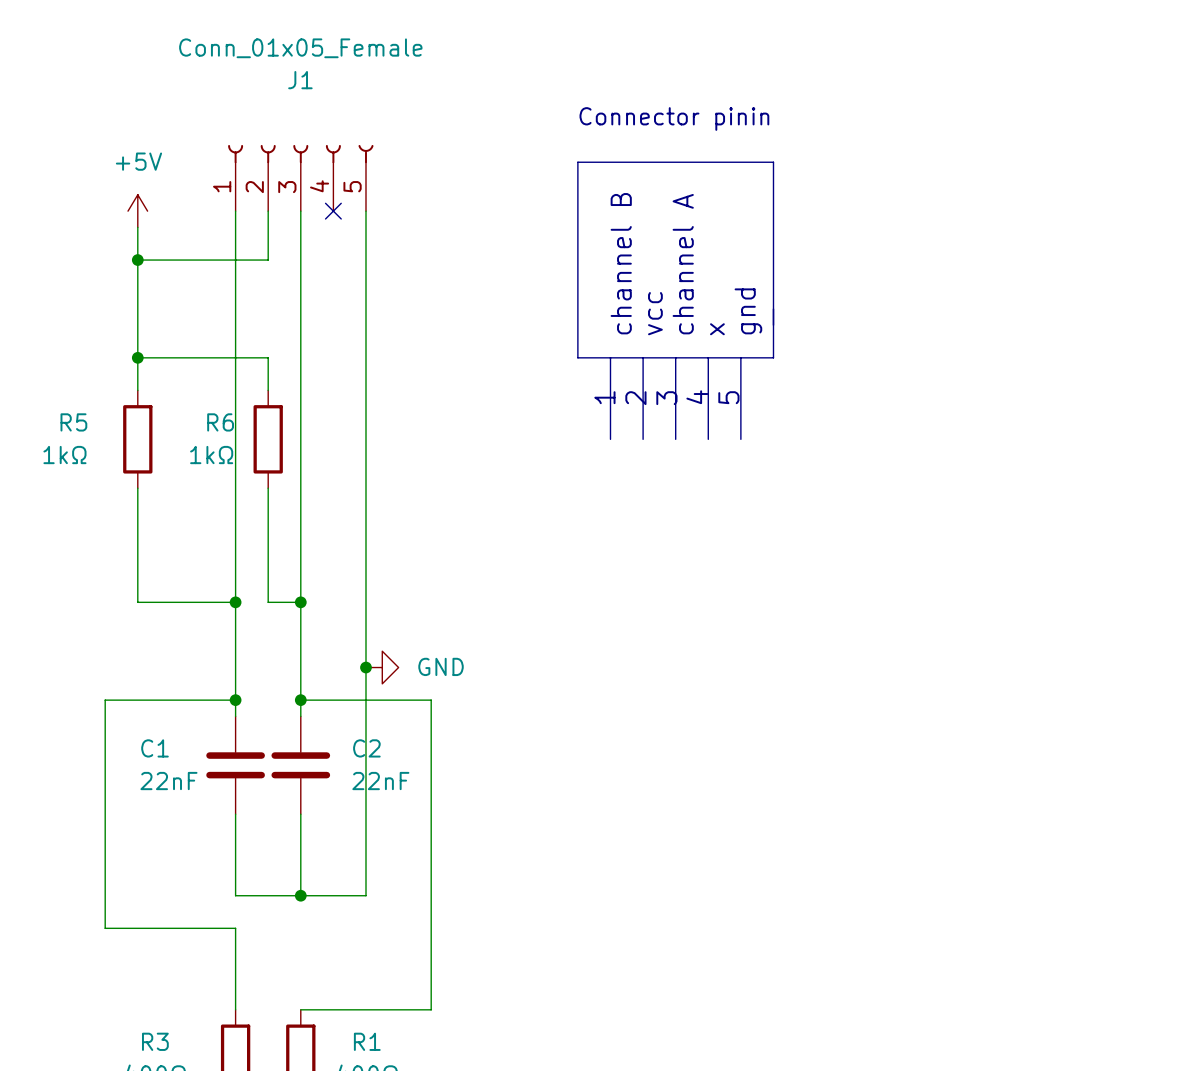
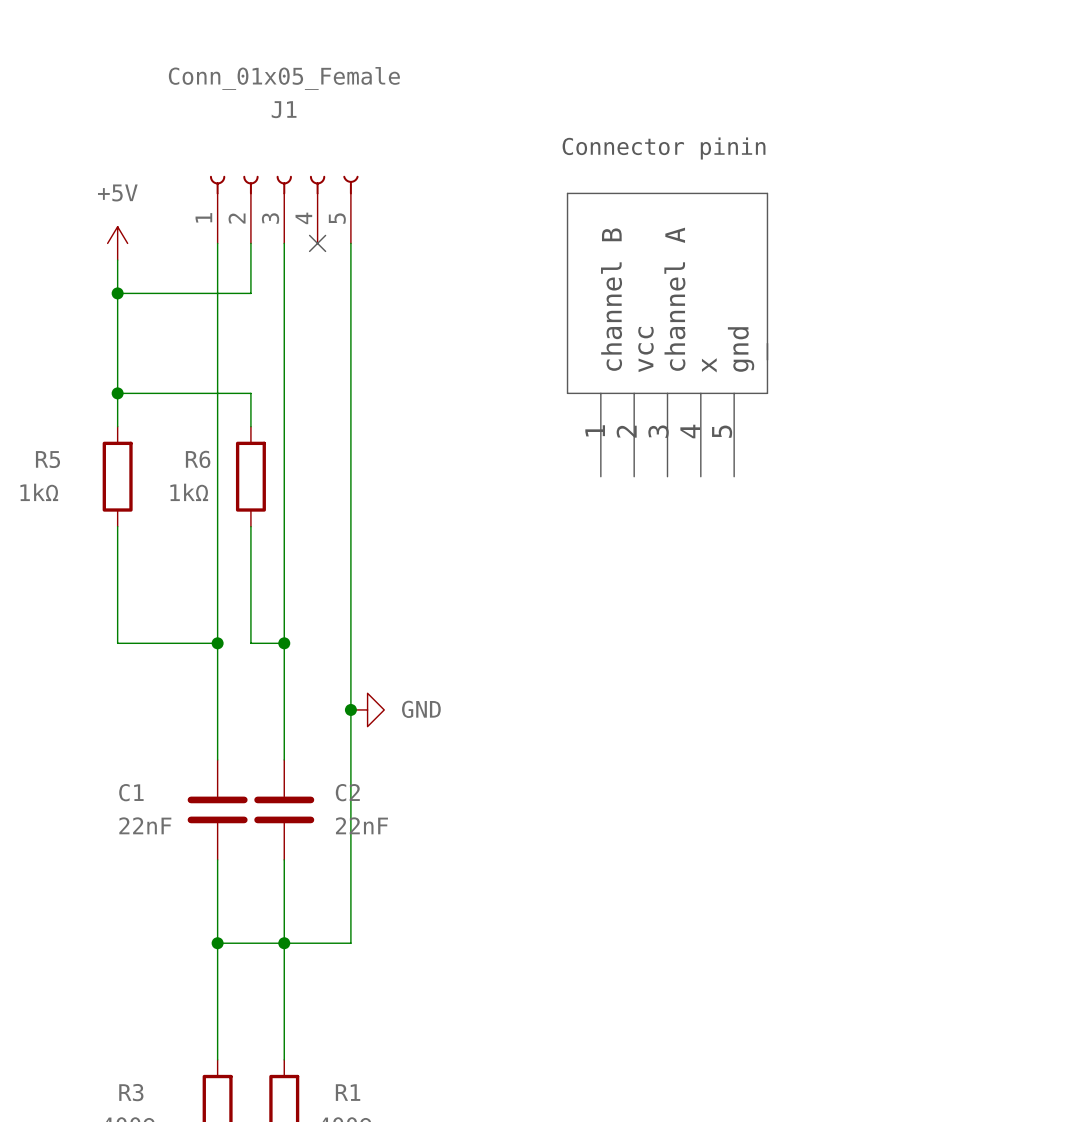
wire: (235, 700) (105, 700) (105, 928) (235, 928) -> (217, 943) (217, 976)
junction: (235, 700) -> none
wire: (300, 700) (431, 700) (431, 1009) (300, 1009) -> (284, 943) (284, 1059)
junction: (300, 700) -> none
junction: none -> (217, 943)

